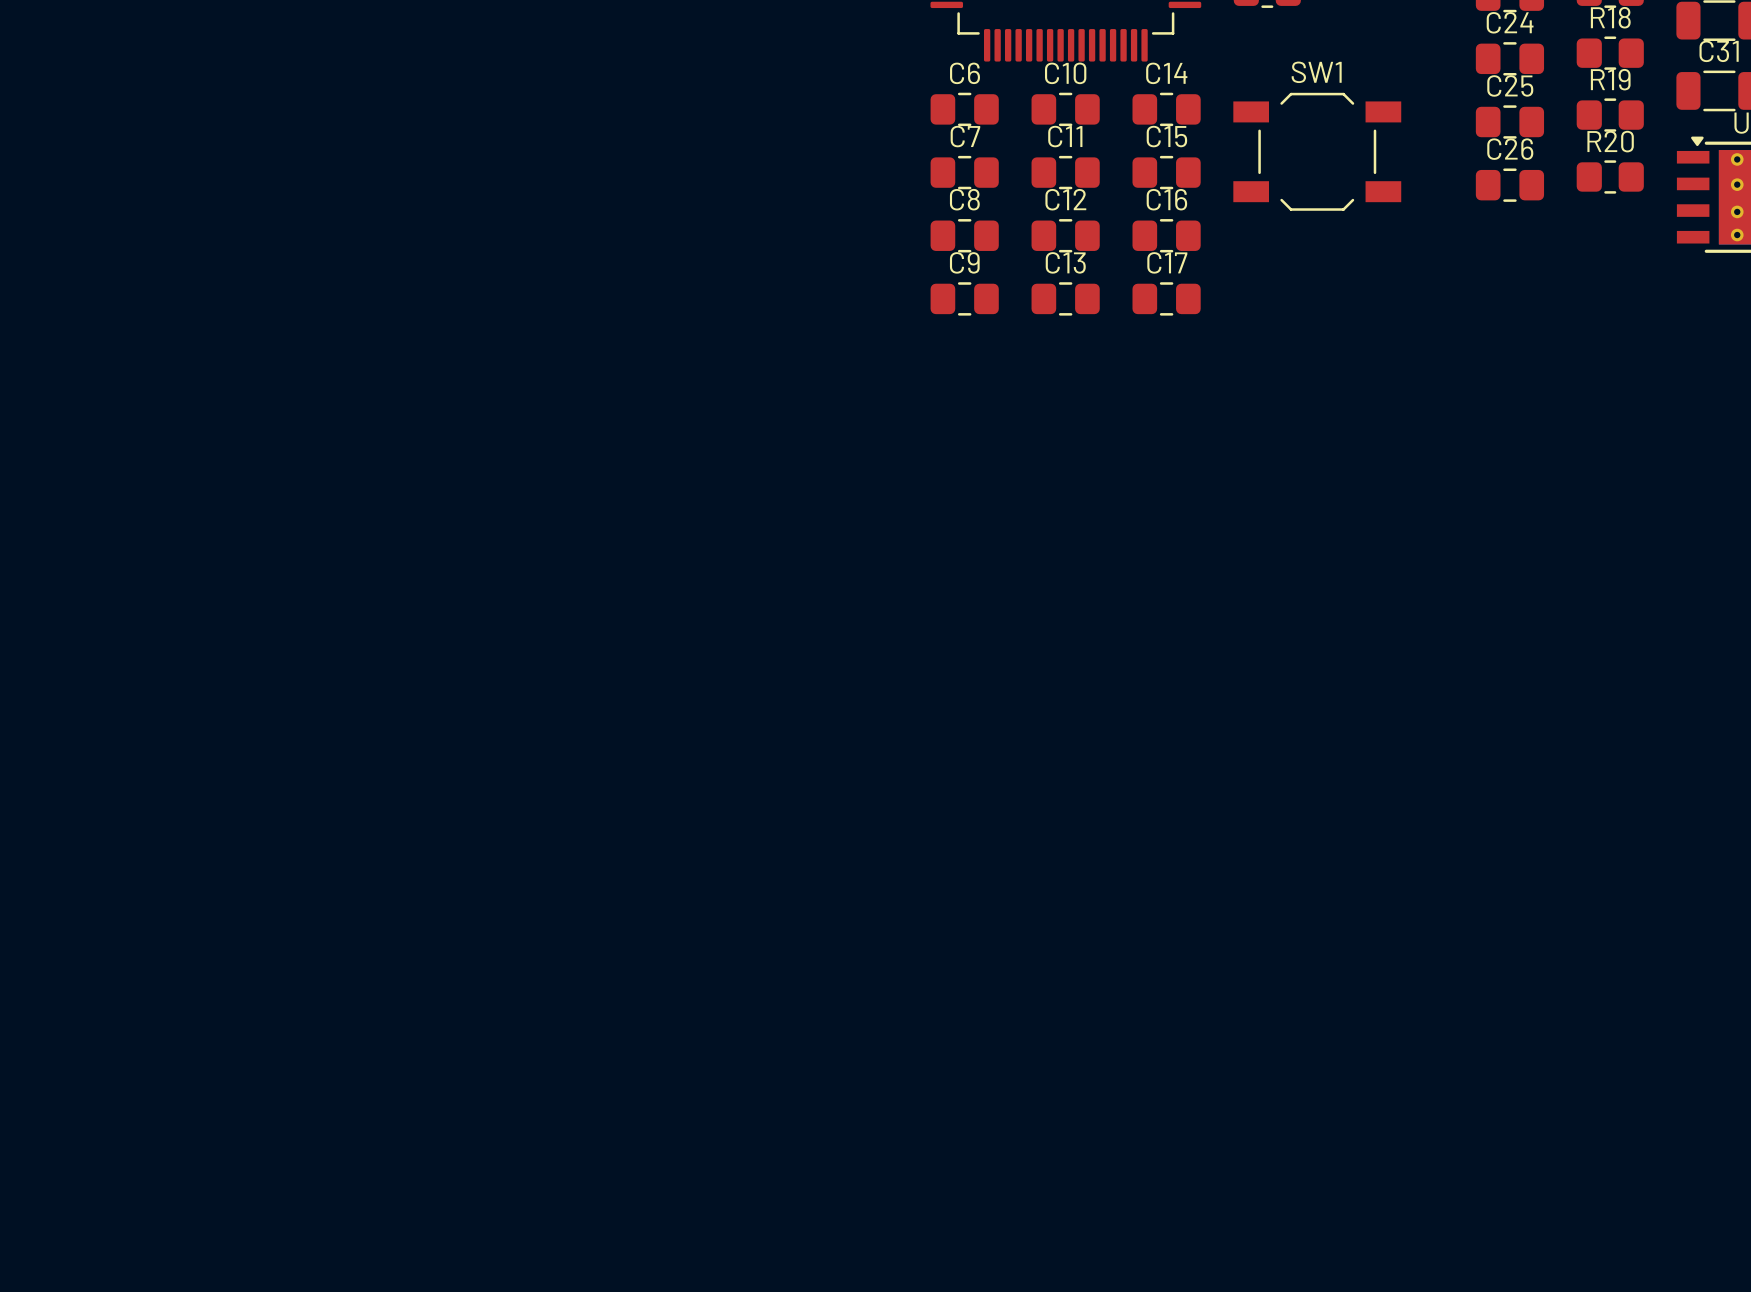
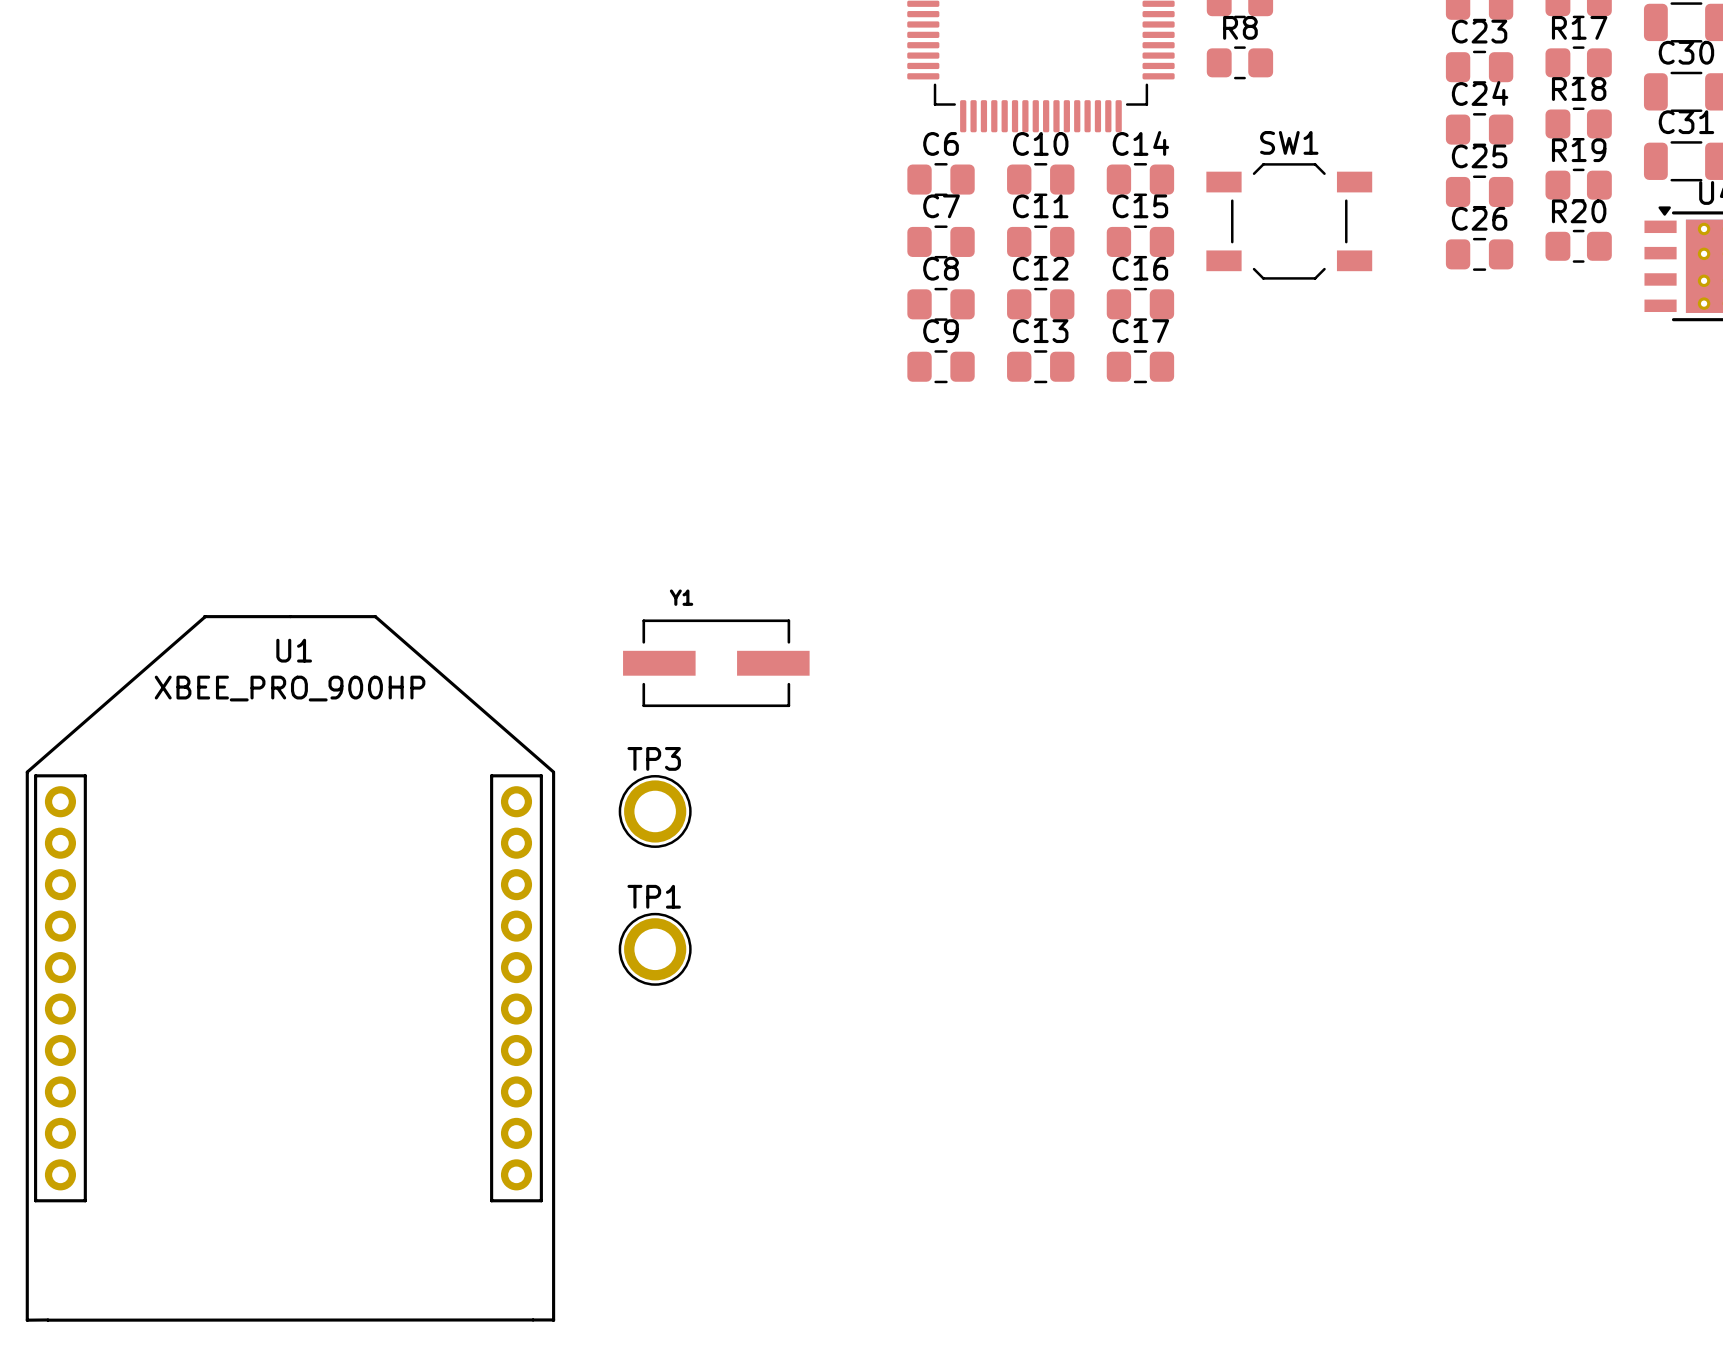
Y1: none -> (716, 663)
TP3: none -> (655, 811)
TP1: none -> (655, 949)
U1: none -> XBEE_PRO_900HP (290, 968)

